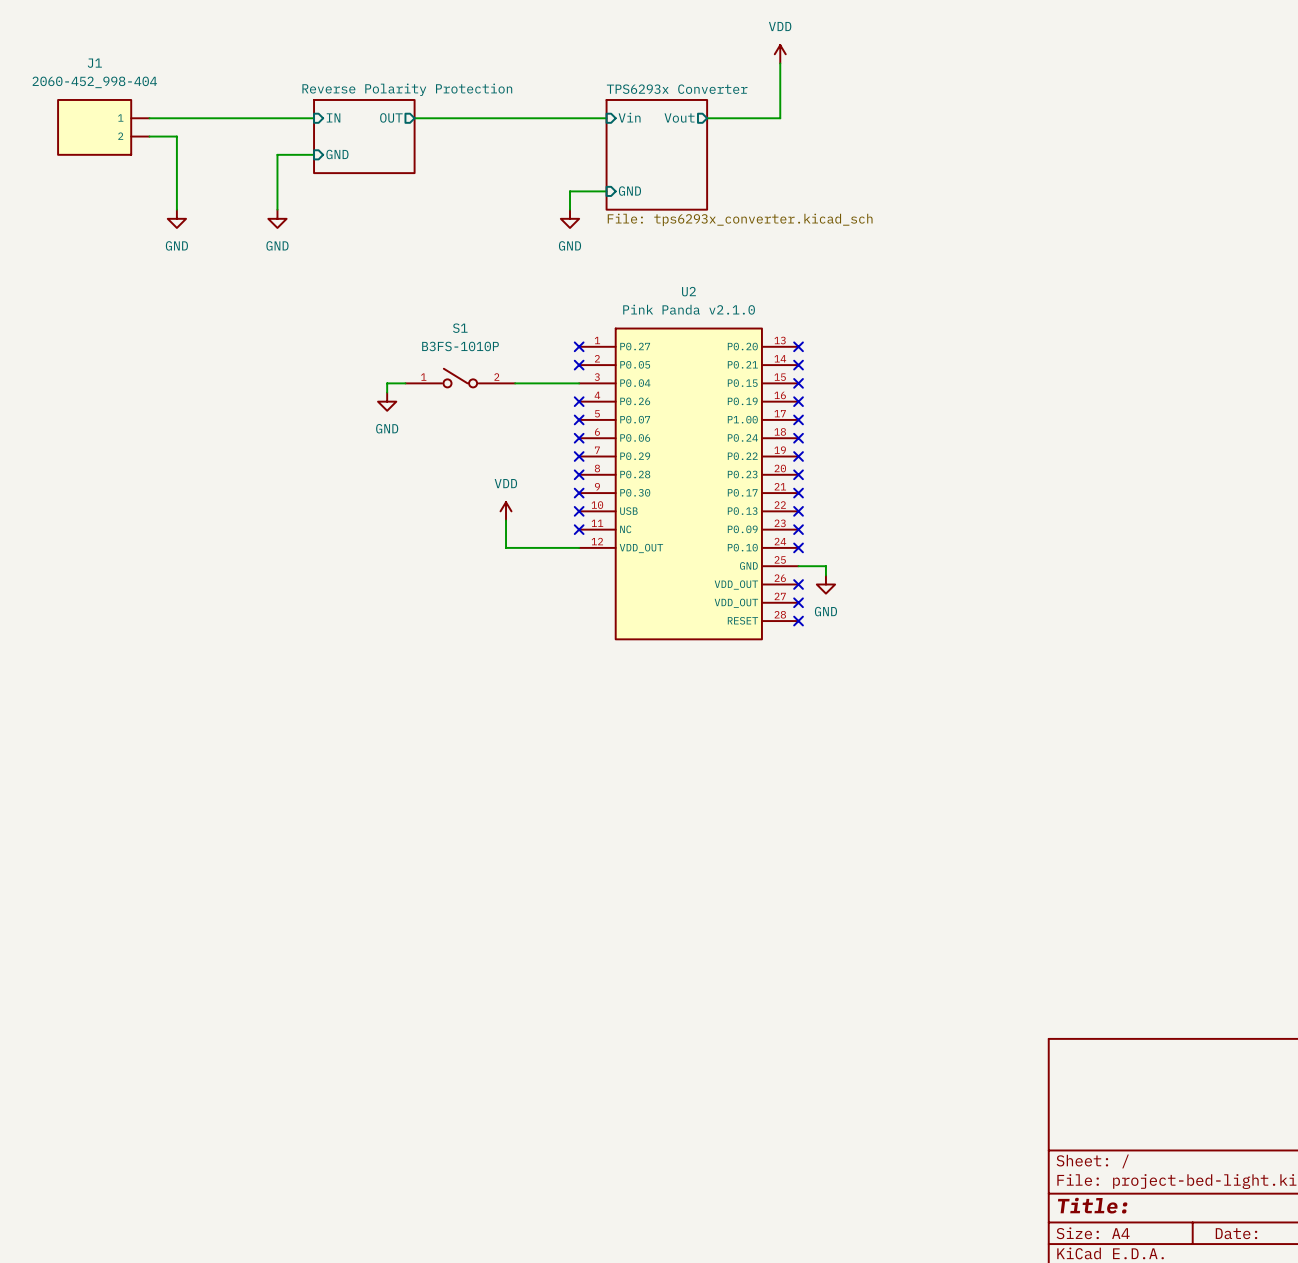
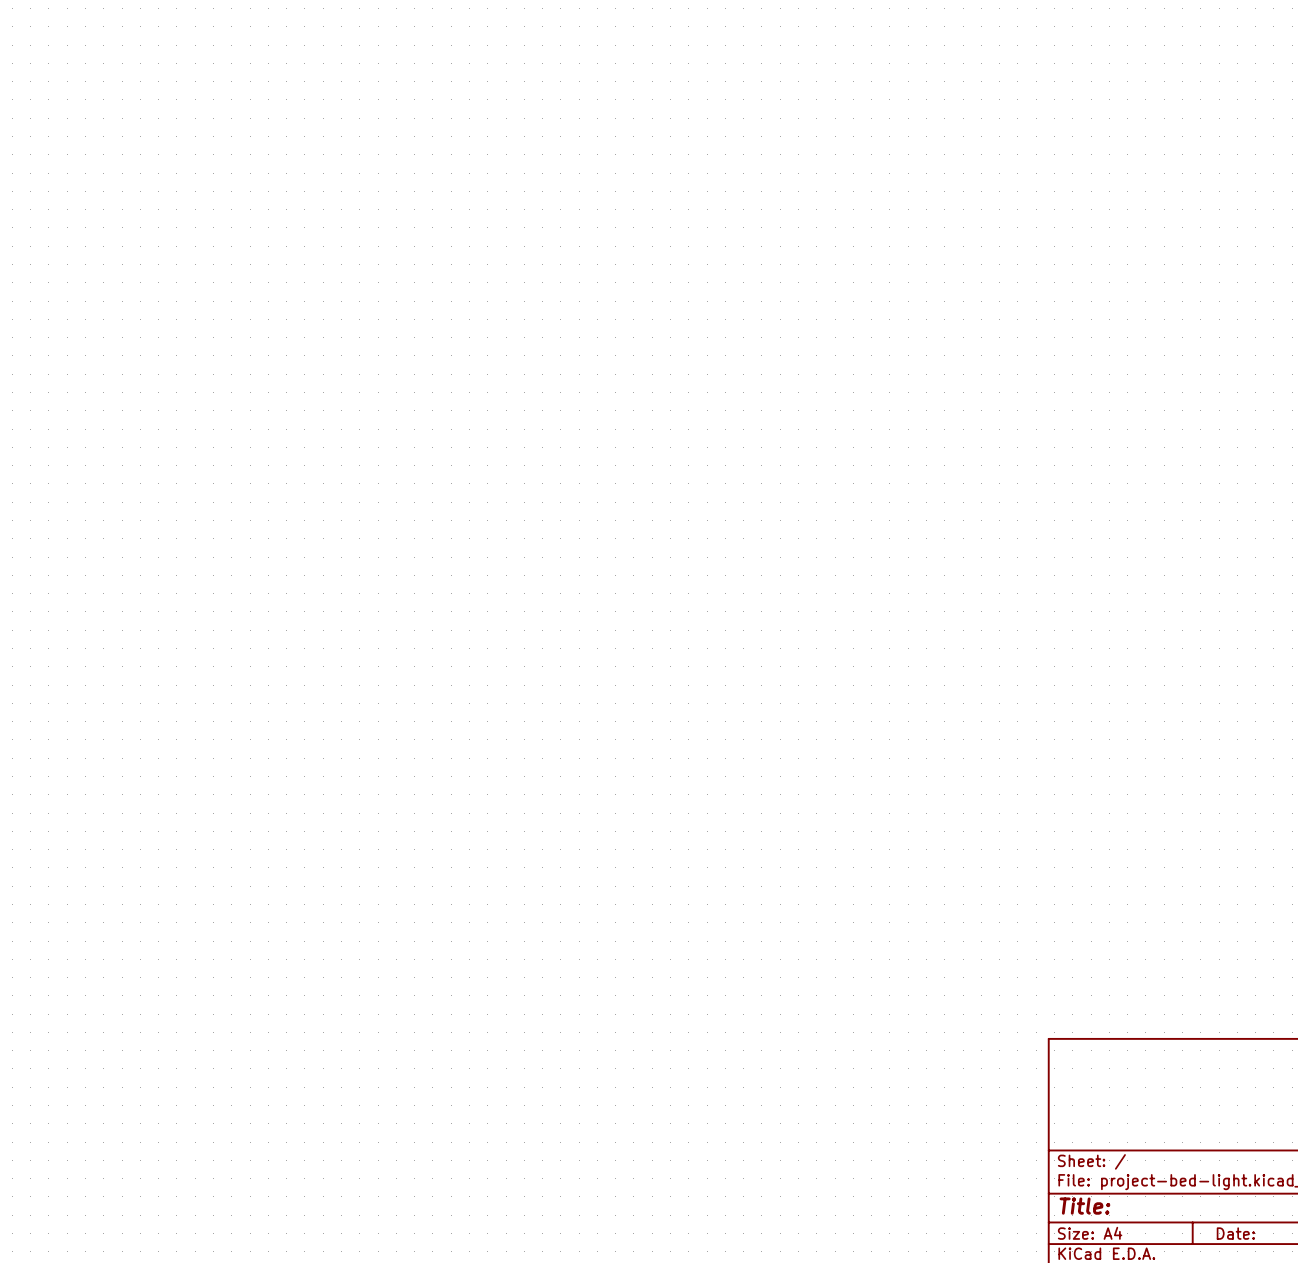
power symbol: VDD (780, 54) -> none
wire: (780, 63) (780, 118) (707, 118) -> none
sheet pin: IN (333, 117) -> none
sheet pin: OUT (391, 117) -> none
sheet pin: Vin (629, 117) -> none
wire: (149, 118) (314, 118) -> none
wire: (414, 118) (606, 118) -> none
sheet pin: Vout (679, 118) -> none
J1: 2060-452_998-404 (103, 127) -> none
wire: (149, 136) (176, 136) (176, 209) -> none
sheet Reverse Polarity Protection: (364, 136) -> none
wire: (314, 154) (277, 154) (277, 209) -> none
sheet pin: GND (337, 154) -> none
sheet TPS6293x Converter: File: tps6293x_converter.kicad_sch (656, 154) -> none
wire: (606, 191) (570, 191) (570, 209) -> none
sheet pin: GND (629, 191) -> none
power symbol: GND (176, 218) -> none
power symbol: GND (277, 218) -> none
power symbol: GND (570, 218) -> none
no-connect mark: (579, 346) -> none
no-connect mark: (798, 346) -> none
no-connect mark: (579, 365) -> none
no-connect mark: (798, 365) -> none
S1: B3FS-1010P (460, 378) -> none
wire: (405, 383) (387, 383) (387, 392) -> none
wire: (515, 383) (579, 383) -> none
no-connect mark: (798, 383) -> none
power symbol: GND (387, 401) -> none
no-connect mark: (579, 401) -> none
no-connect mark: (798, 401) -> none
no-connect mark: (579, 419) -> none
no-connect mark: (798, 419) -> none
no-connect mark: (579, 438) -> none
no-connect mark: (798, 438) -> none
no-connect mark: (579, 456) -> none
no-connect mark: (798, 456) -> none
no-connect mark: (579, 474) -> none
no-connect mark: (798, 474) -> none
U2: Pink Panda v2.1.0 (688, 483) -> none
no-connect mark: (579, 493) -> none
no-connect mark: (798, 493) -> none
power symbol: VDD (506, 511) -> none
no-connect mark: (579, 511) -> none
no-connect mark: (798, 511) -> none
wire: (506, 520) (506, 547) (579, 547) -> none
no-connect mark: (579, 529) -> none
no-connect mark: (798, 529) -> none
no-connect mark: (798, 547) -> none
wire: (798, 566) (825, 566) (825, 575) -> none
no-connect mark: (798, 584) -> none
power symbol: GND (825, 584) -> none
no-connect mark: (798, 602) -> none
no-connect mark: (798, 621) -> none

